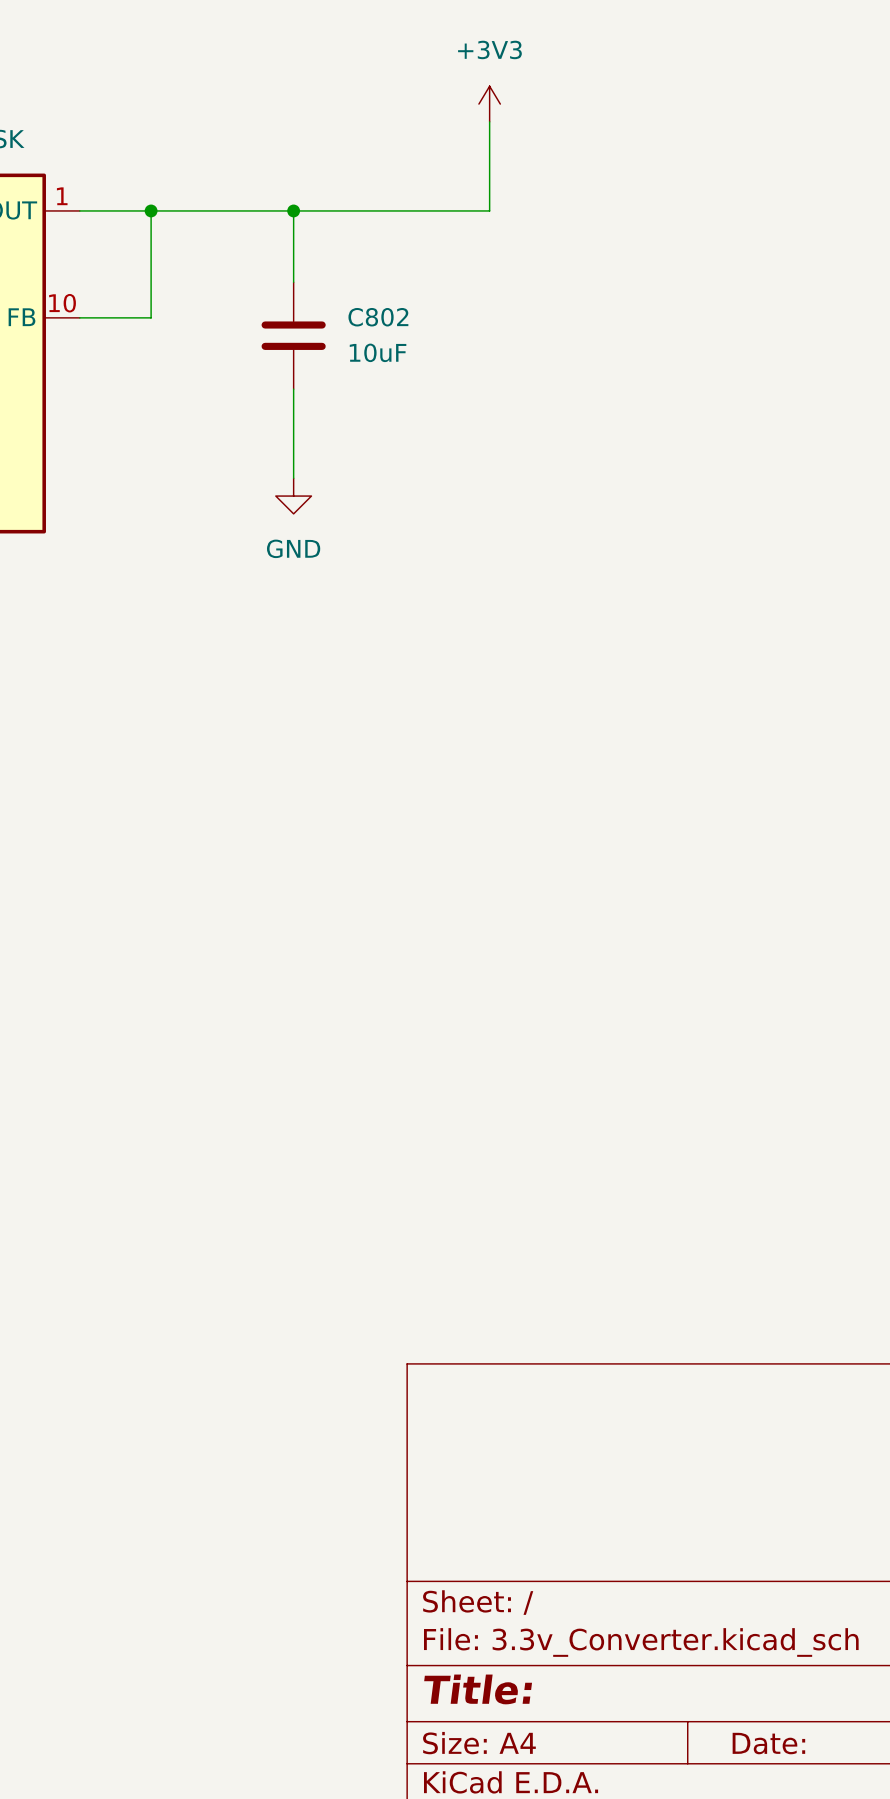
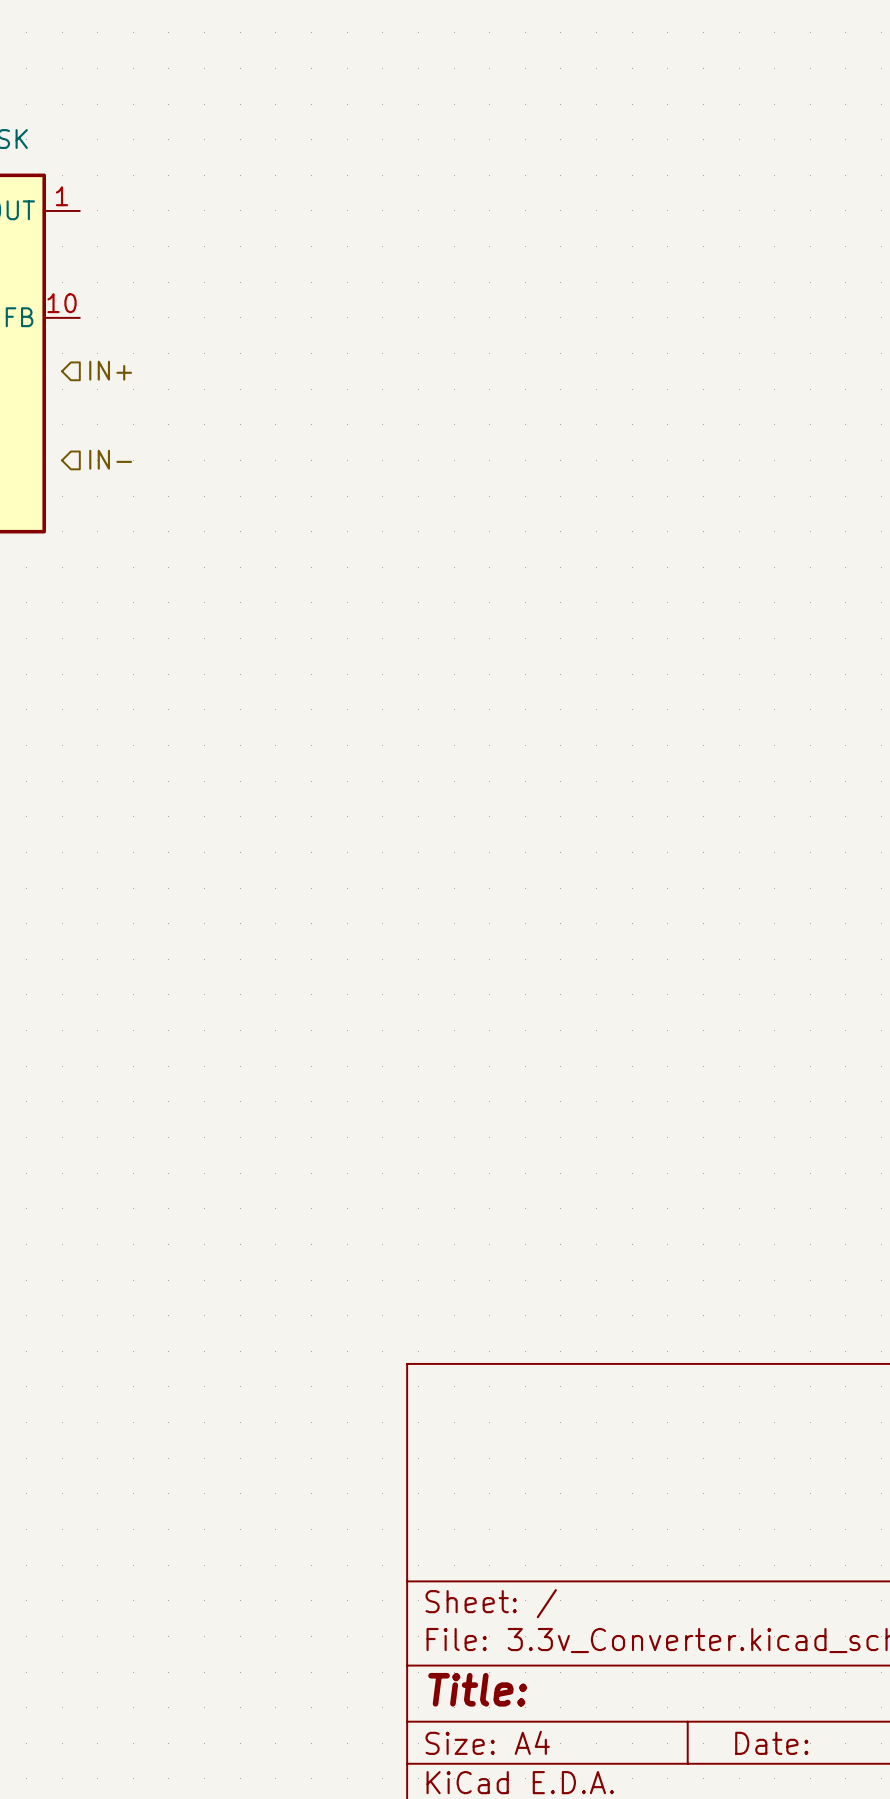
power symbol: +3V3 (489, 104) -> none
wire: (489, 121) (489, 210) (79, 210) -> none
wire: (151, 210) (151, 317) (79, 317) -> none
junction: (151, 210) -> none
wire: (293, 210) (293, 282) -> none
junction: (293, 210) -> none
C802: 10uF (293, 335) -> none
hierarchical label: none -> IN+ (110, 370)
wire: (293, 389) (293, 478) -> none
hierarchical label: none -> IN- (110, 459)
power symbol: GND (293, 496) -> none

